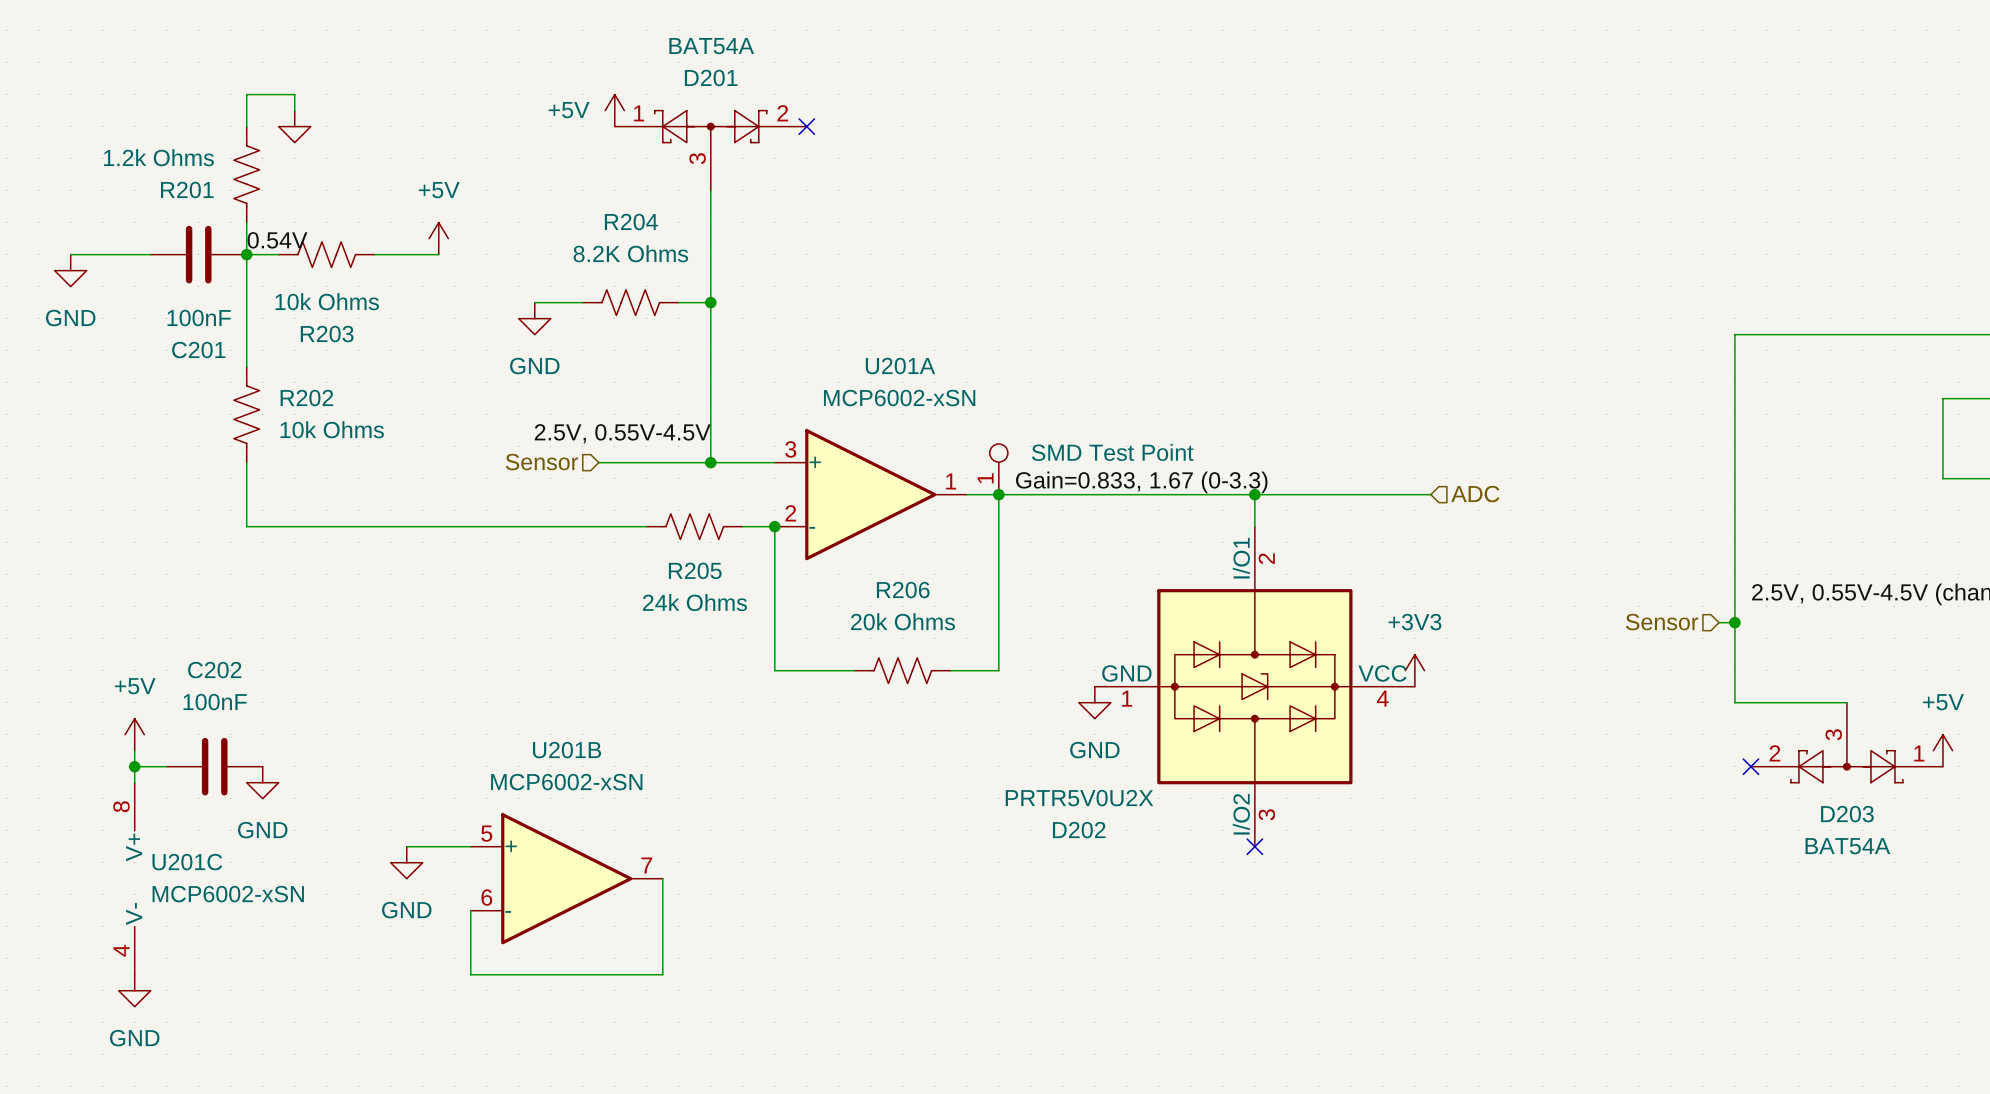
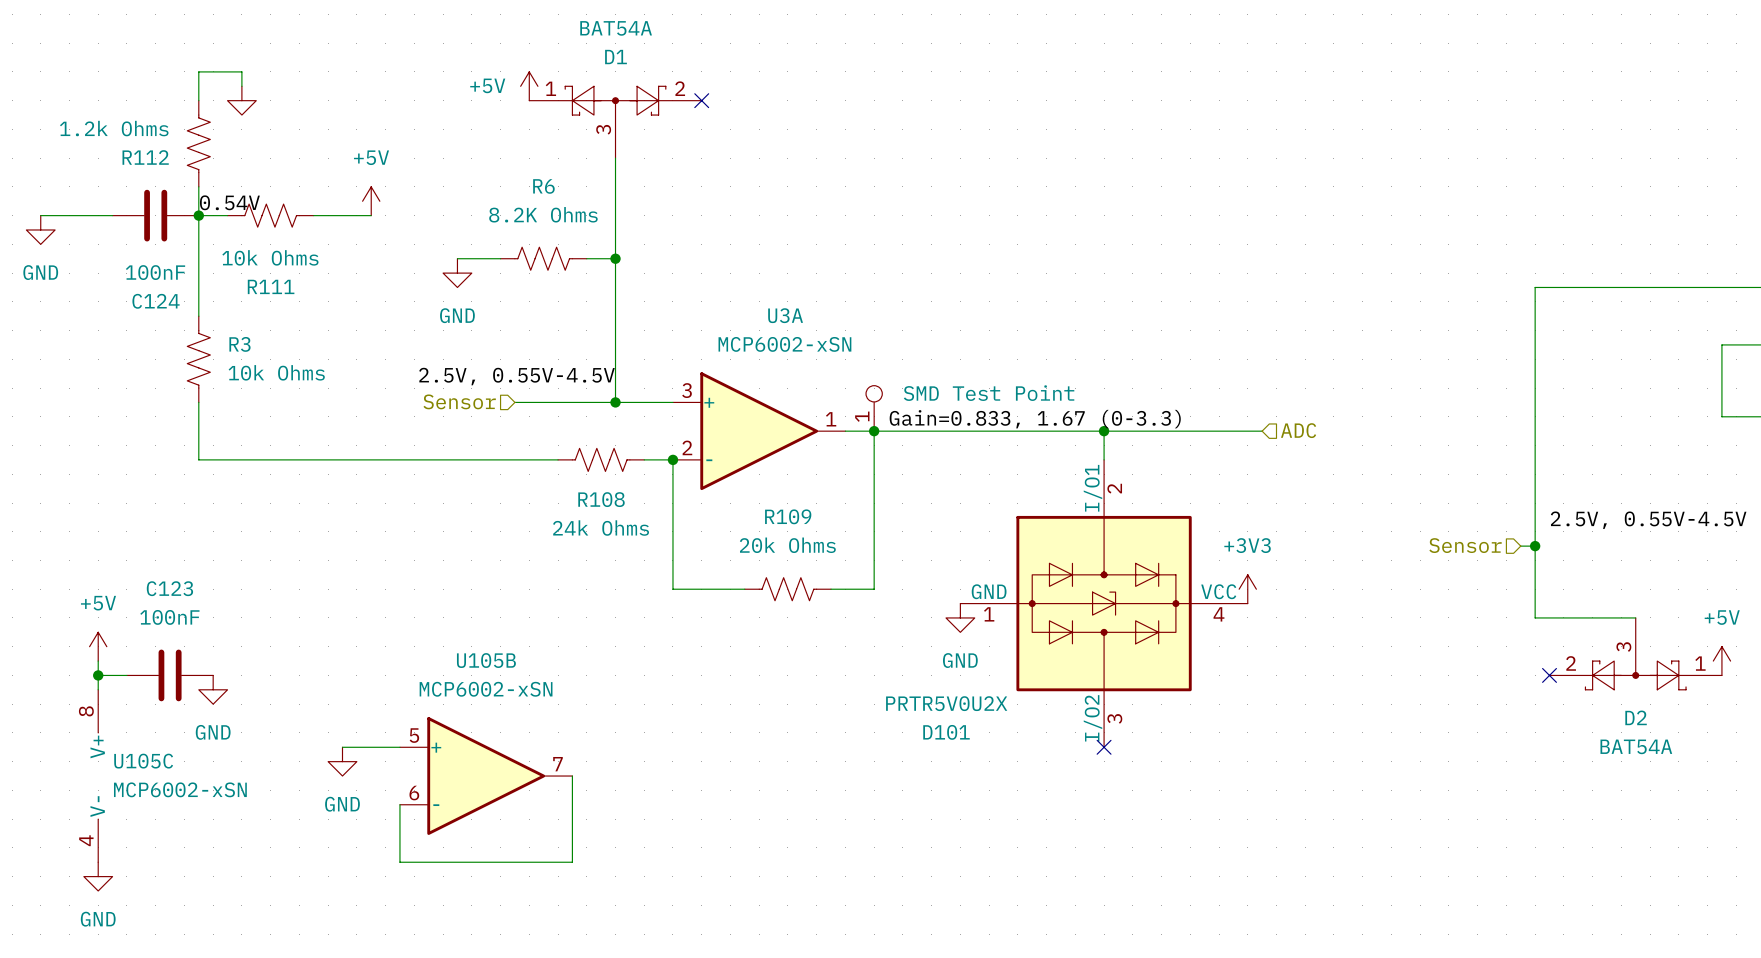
D201 name: D201 (711, 77) -> D1 (616, 57)
R201 name: R201 (187, 190) -> R112 (145, 157)
R204 name: R204 (631, 222) -> R6 (543, 186)
R203 name: R203 (327, 334) -> R111 (271, 286)
C201 name: C201 (198, 350) -> C124 (156, 301)
U201A name: U201A (900, 366) -> U3A (785, 315)
R202 name: R202 (306, 398) -> R3 (239, 344)
R205 name: R205 (695, 570) -> R108 (601, 499)
R206 name: R206 (903, 590) -> R109 (788, 516)
C202 name: C202 (214, 670) -> C123 (169, 588)
U201B name: U201B (567, 750) -> U105B (486, 660)
D203 name: D203 (1847, 814) -> D2 (1636, 717)
D202 name: D202 (1079, 830) -> D101 (946, 732)
U201C name: U201C (187, 862) -> U105C (143, 761)

